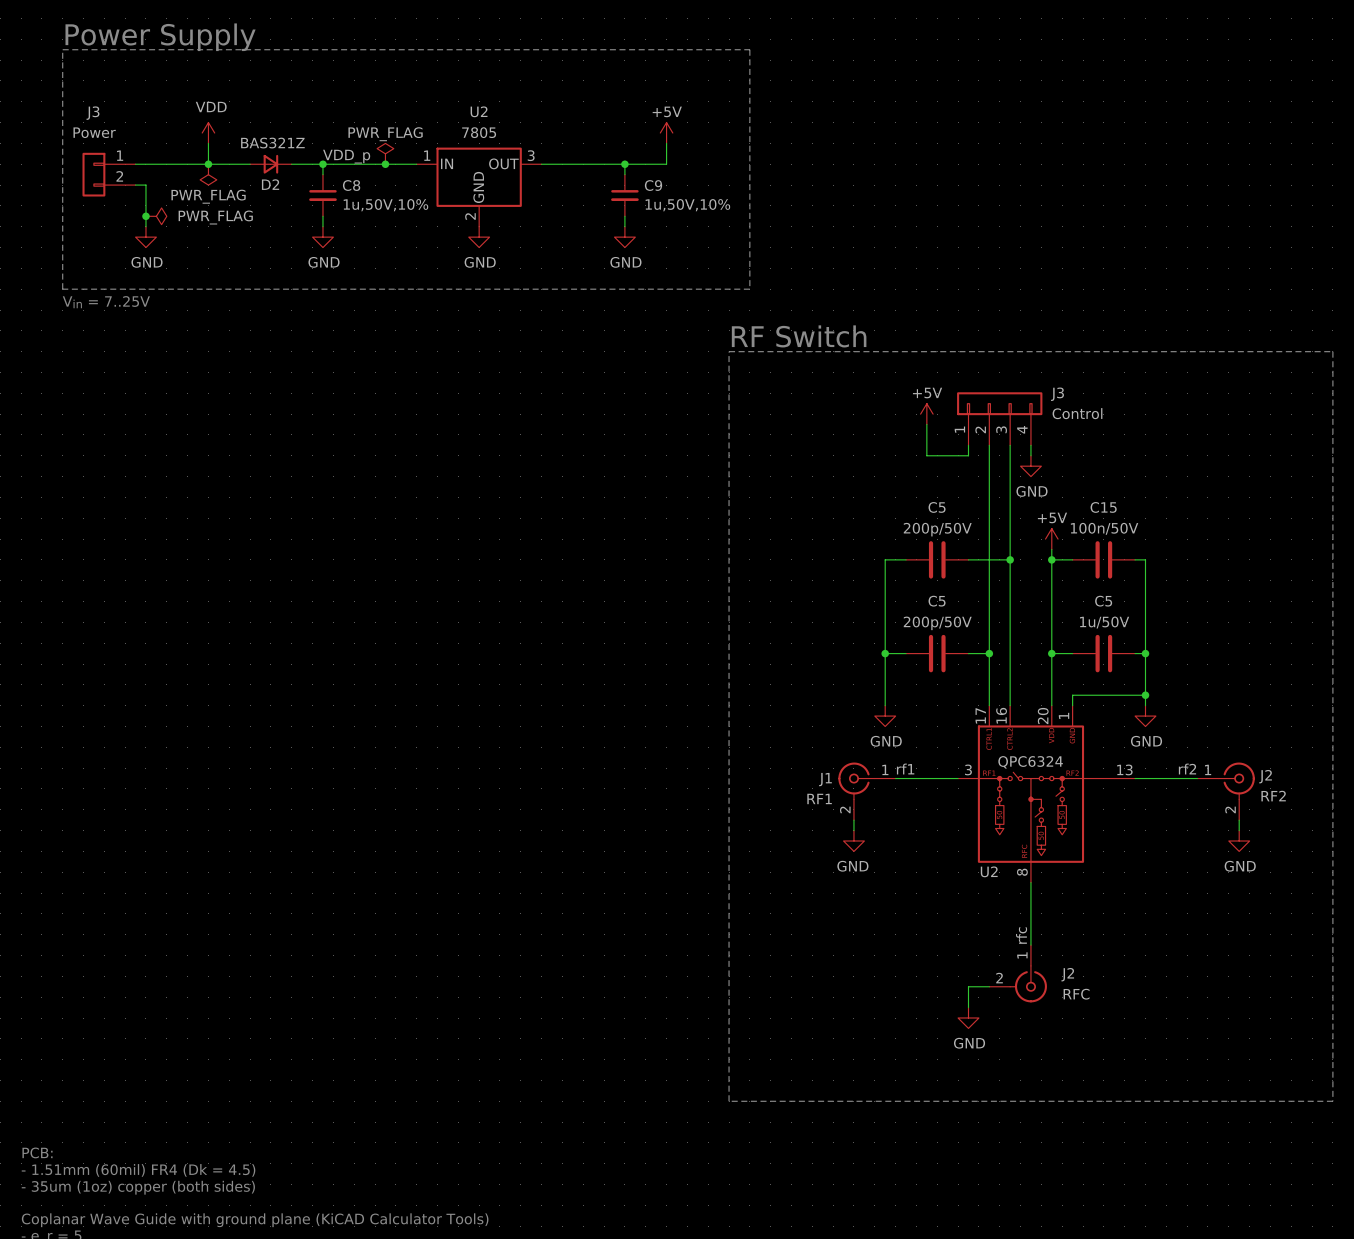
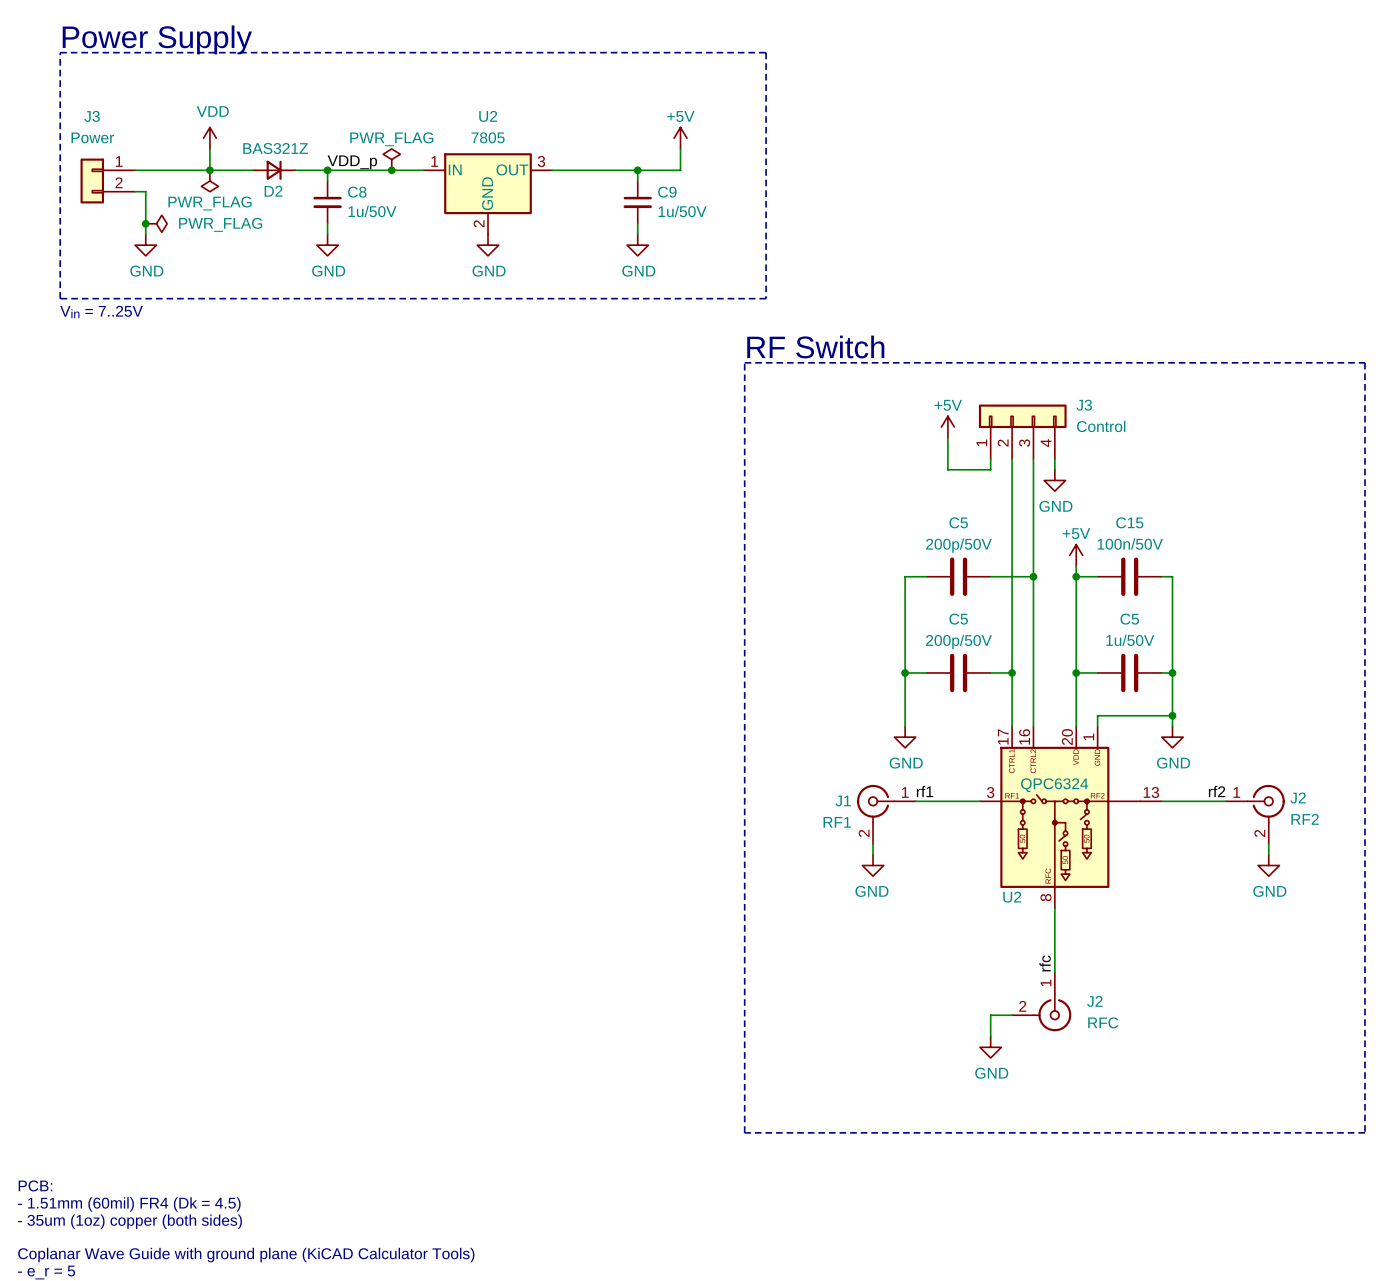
C8 value: 1u,50V,10% (385, 205) -> 1u/50V (372, 211)
C9 value: 1u,50V,10% (687, 205) -> 1u/50V (682, 211)

